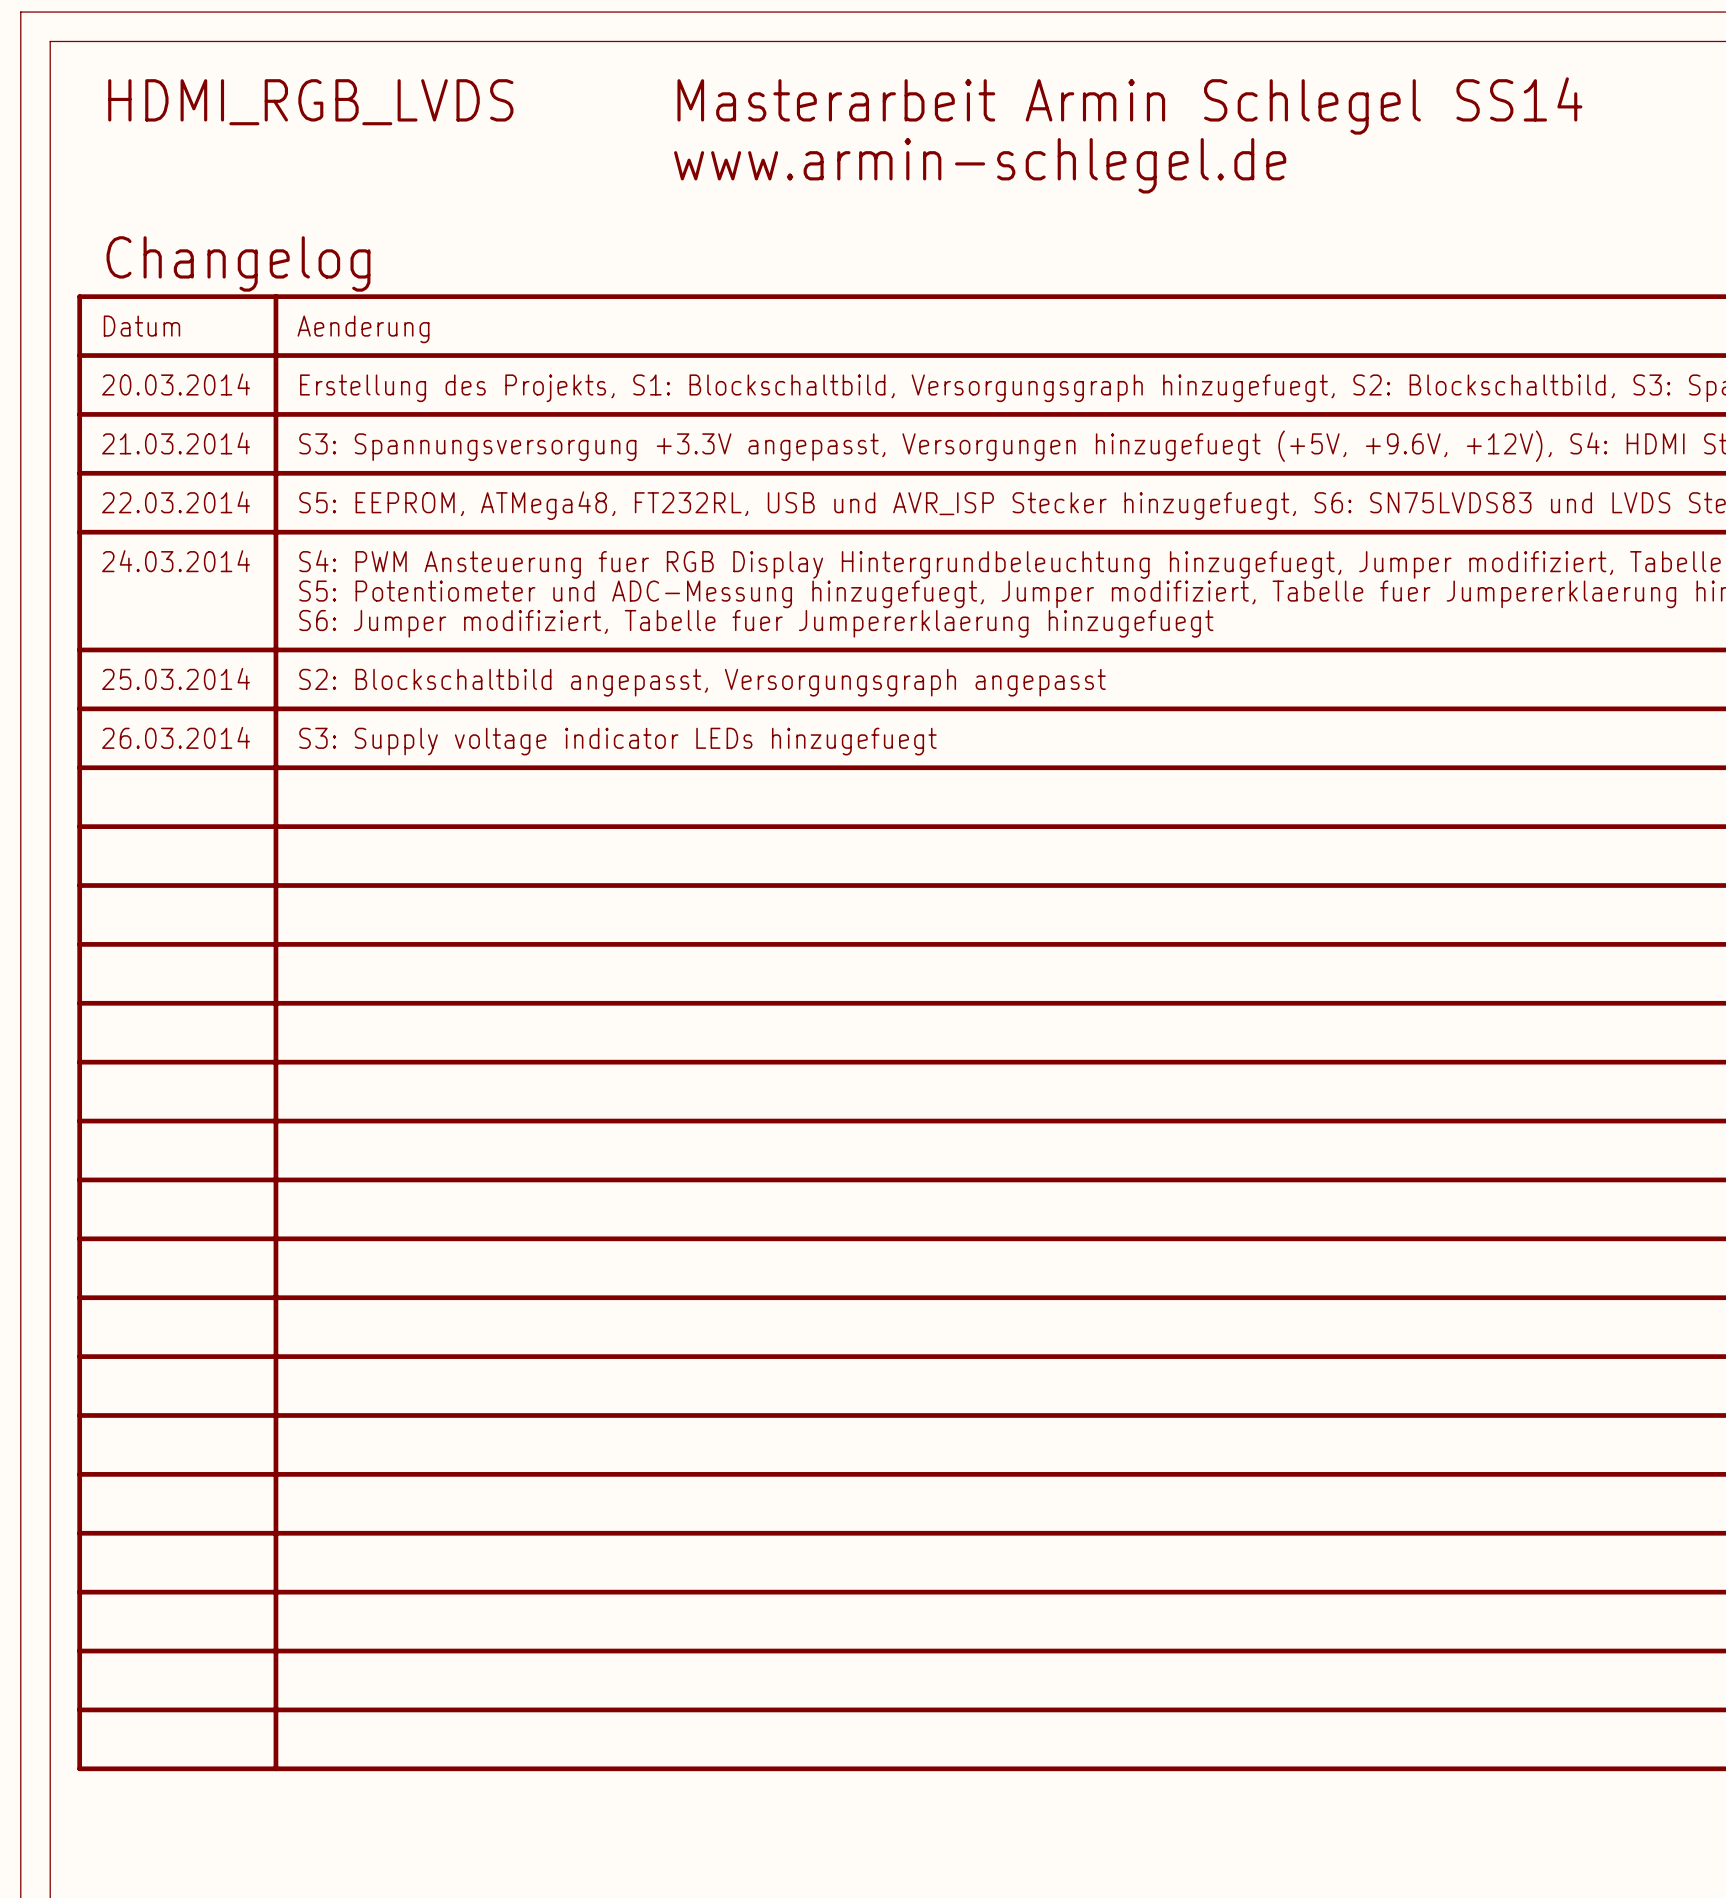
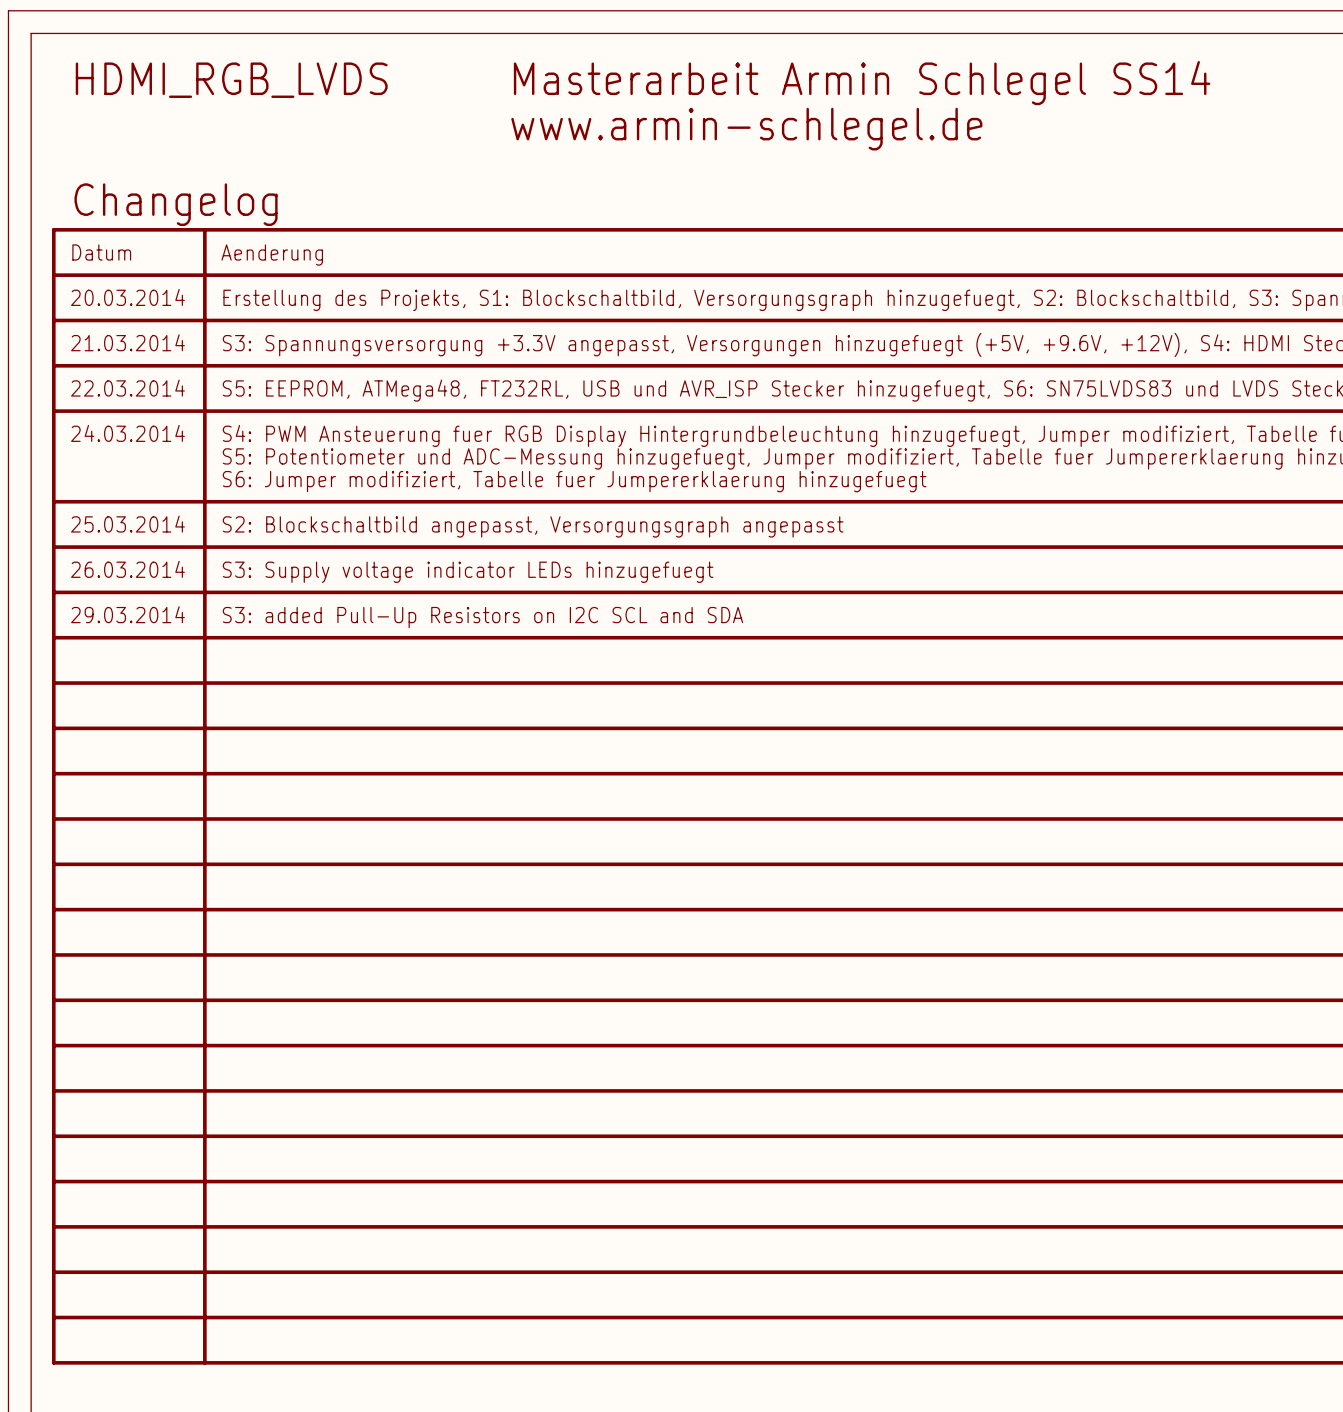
text: none -> 29.03.2014 (127, 614)
text: none -> S3: added Pull-Up Resistors on I2C SCL and SDA (482, 617)

